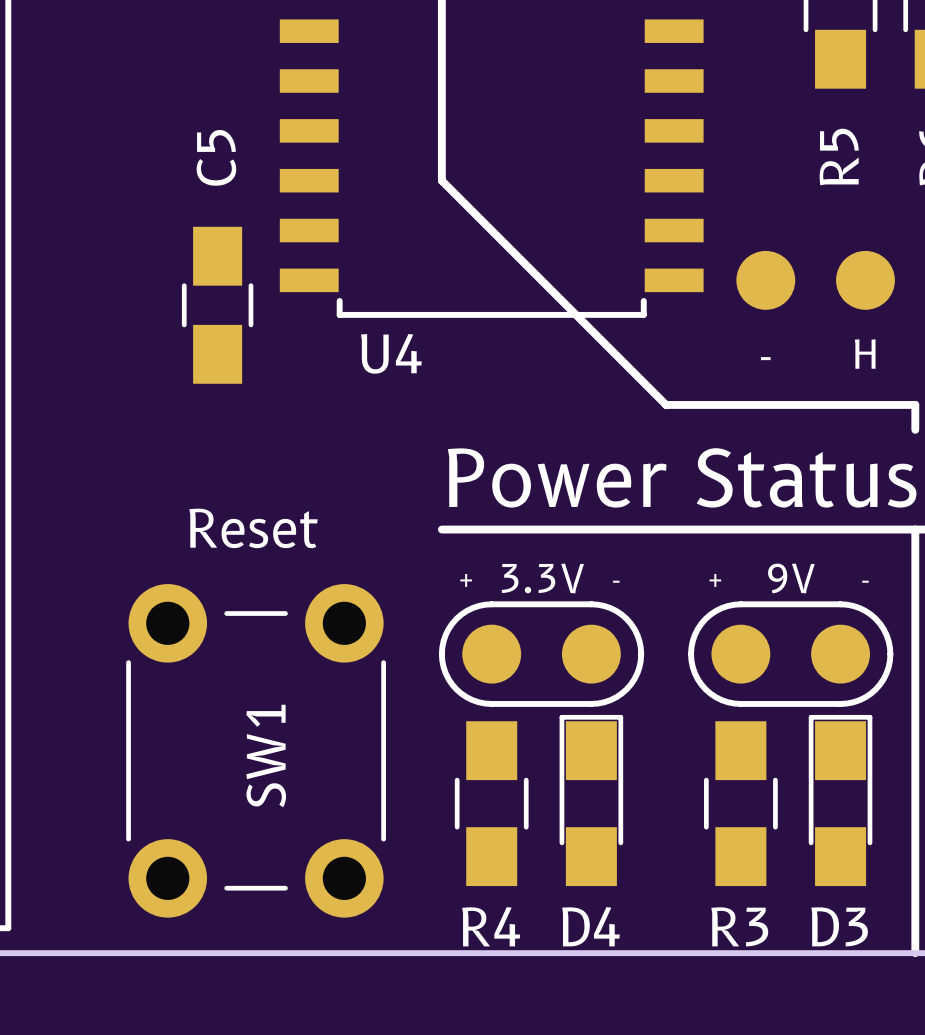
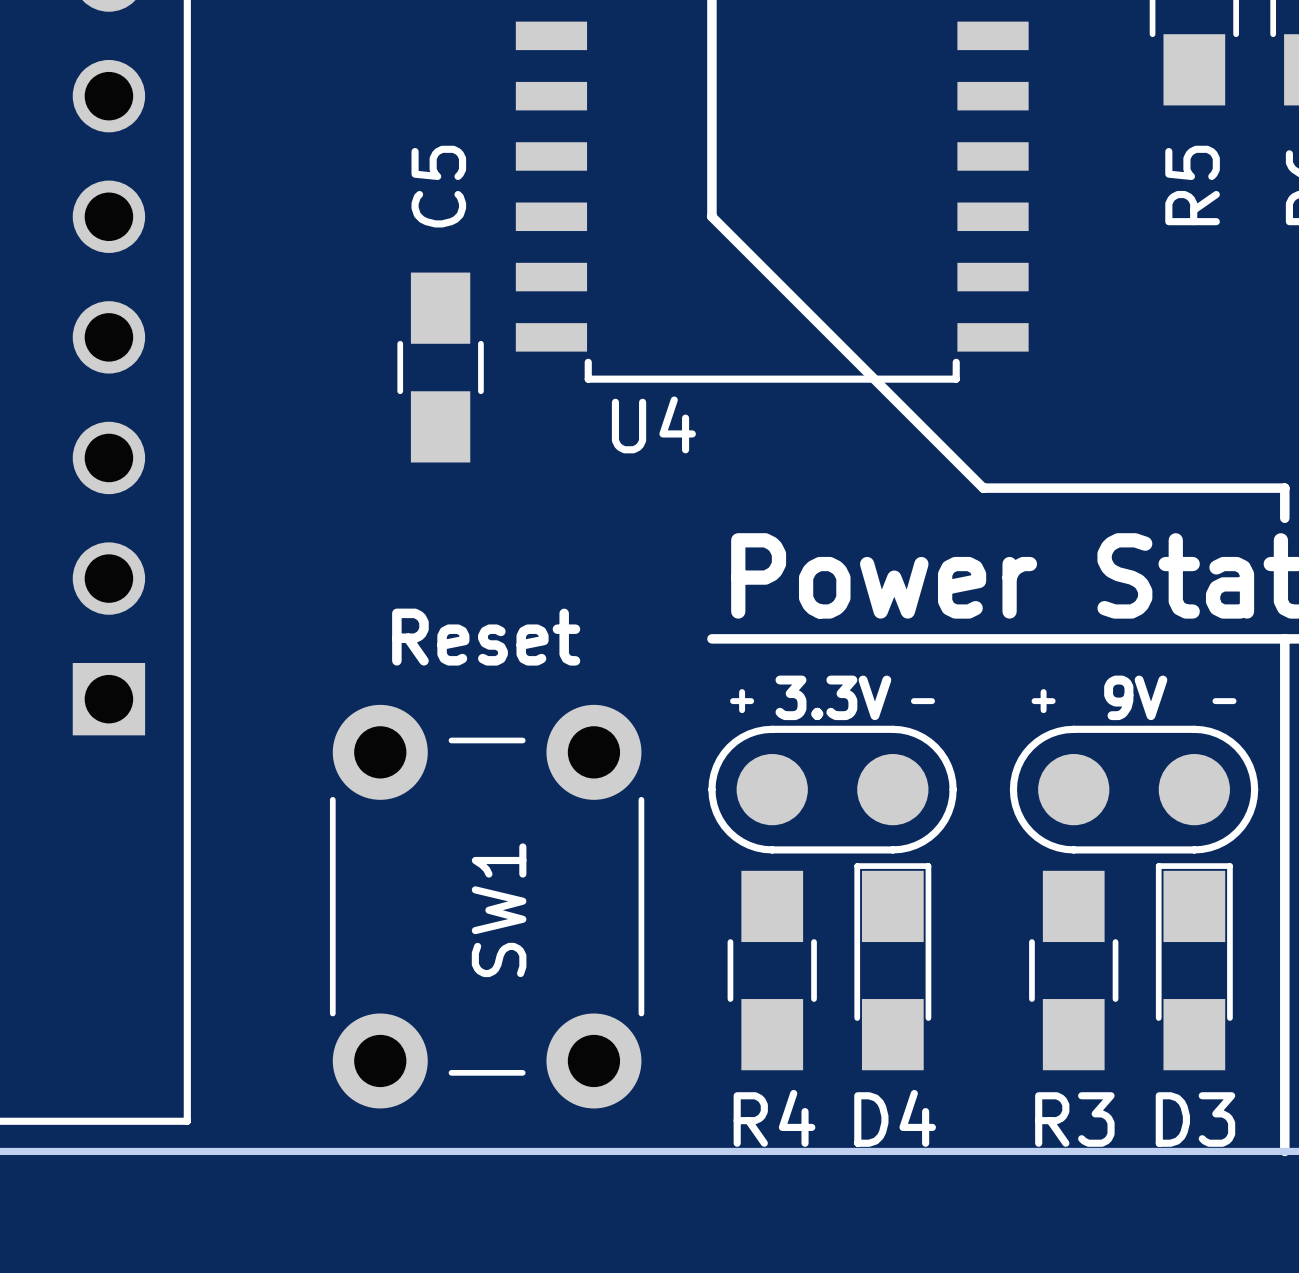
part: (765, 280) -> none
part: (865, 280) -> none
text: H (865, 354) -> none
text: - (765, 358) -> none

